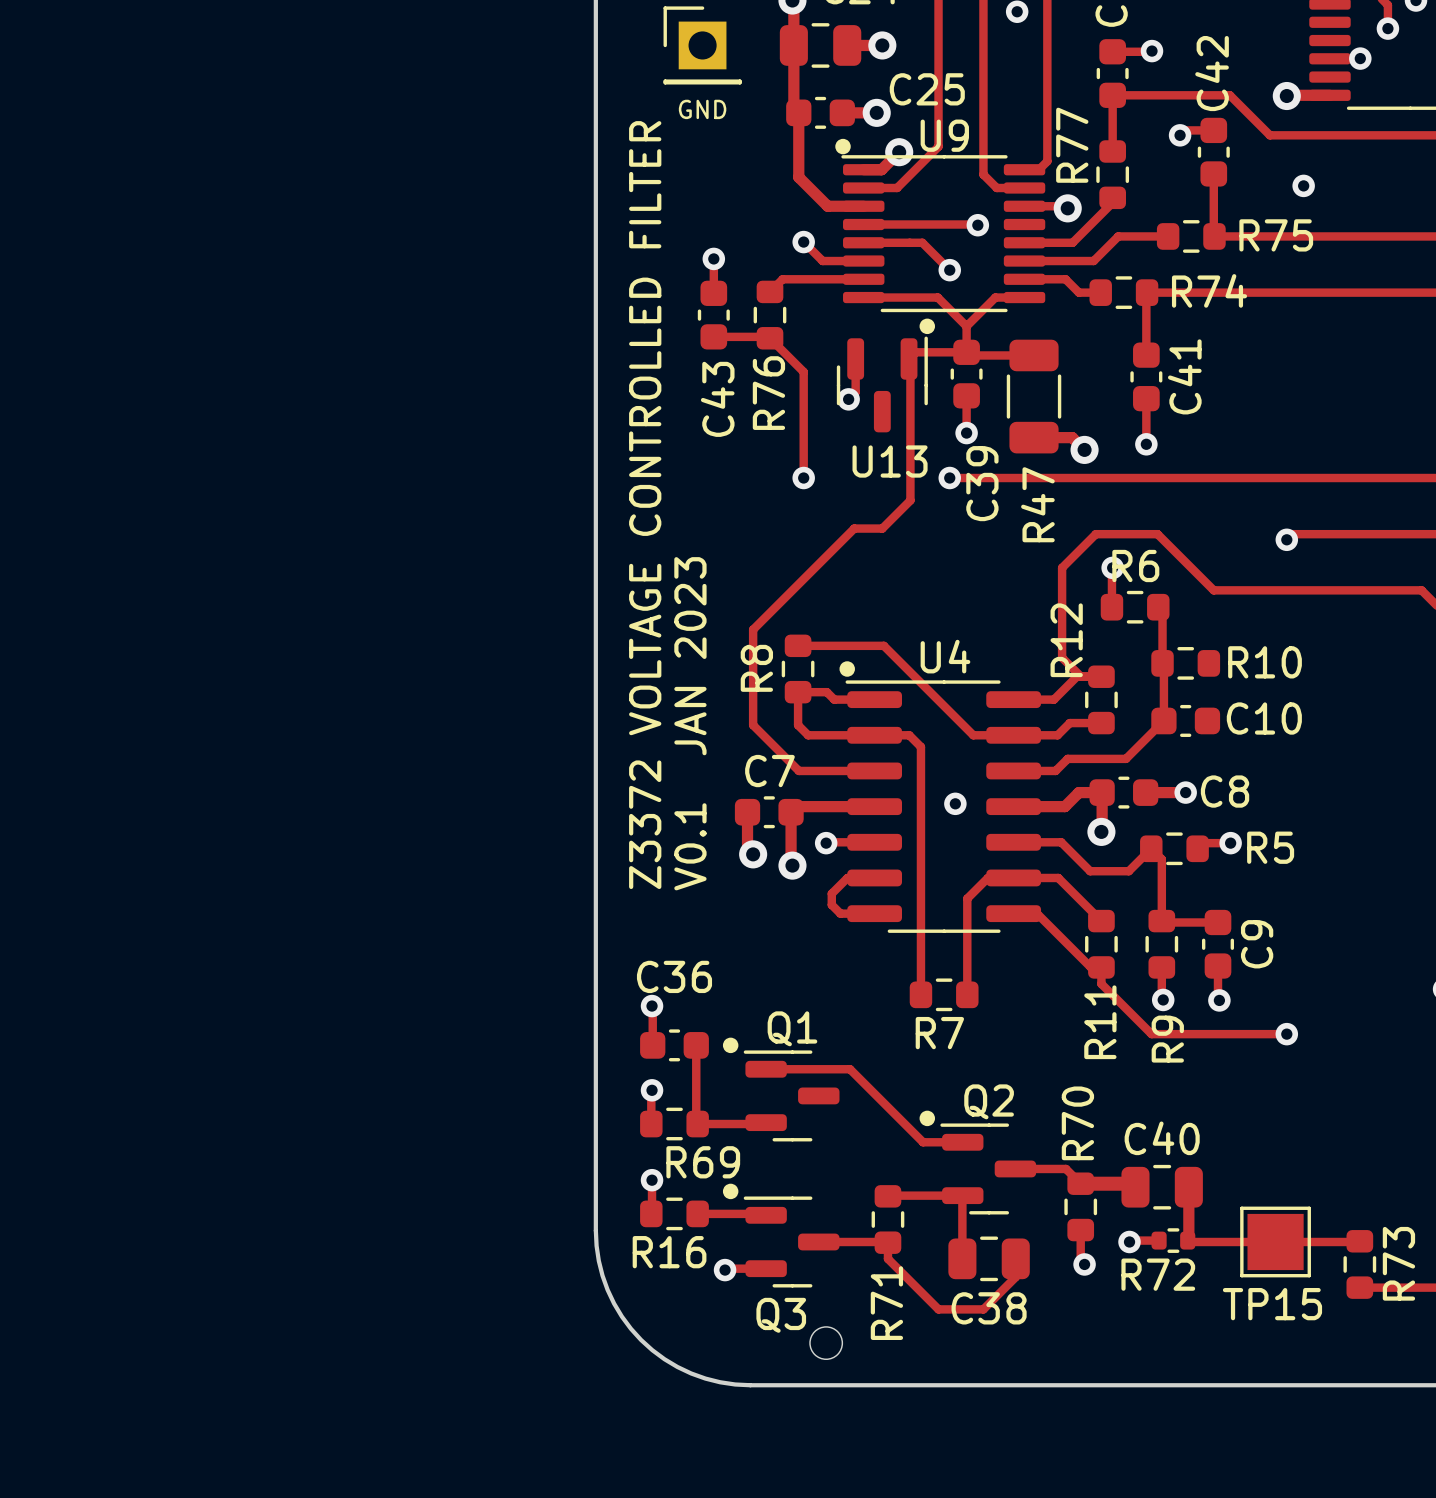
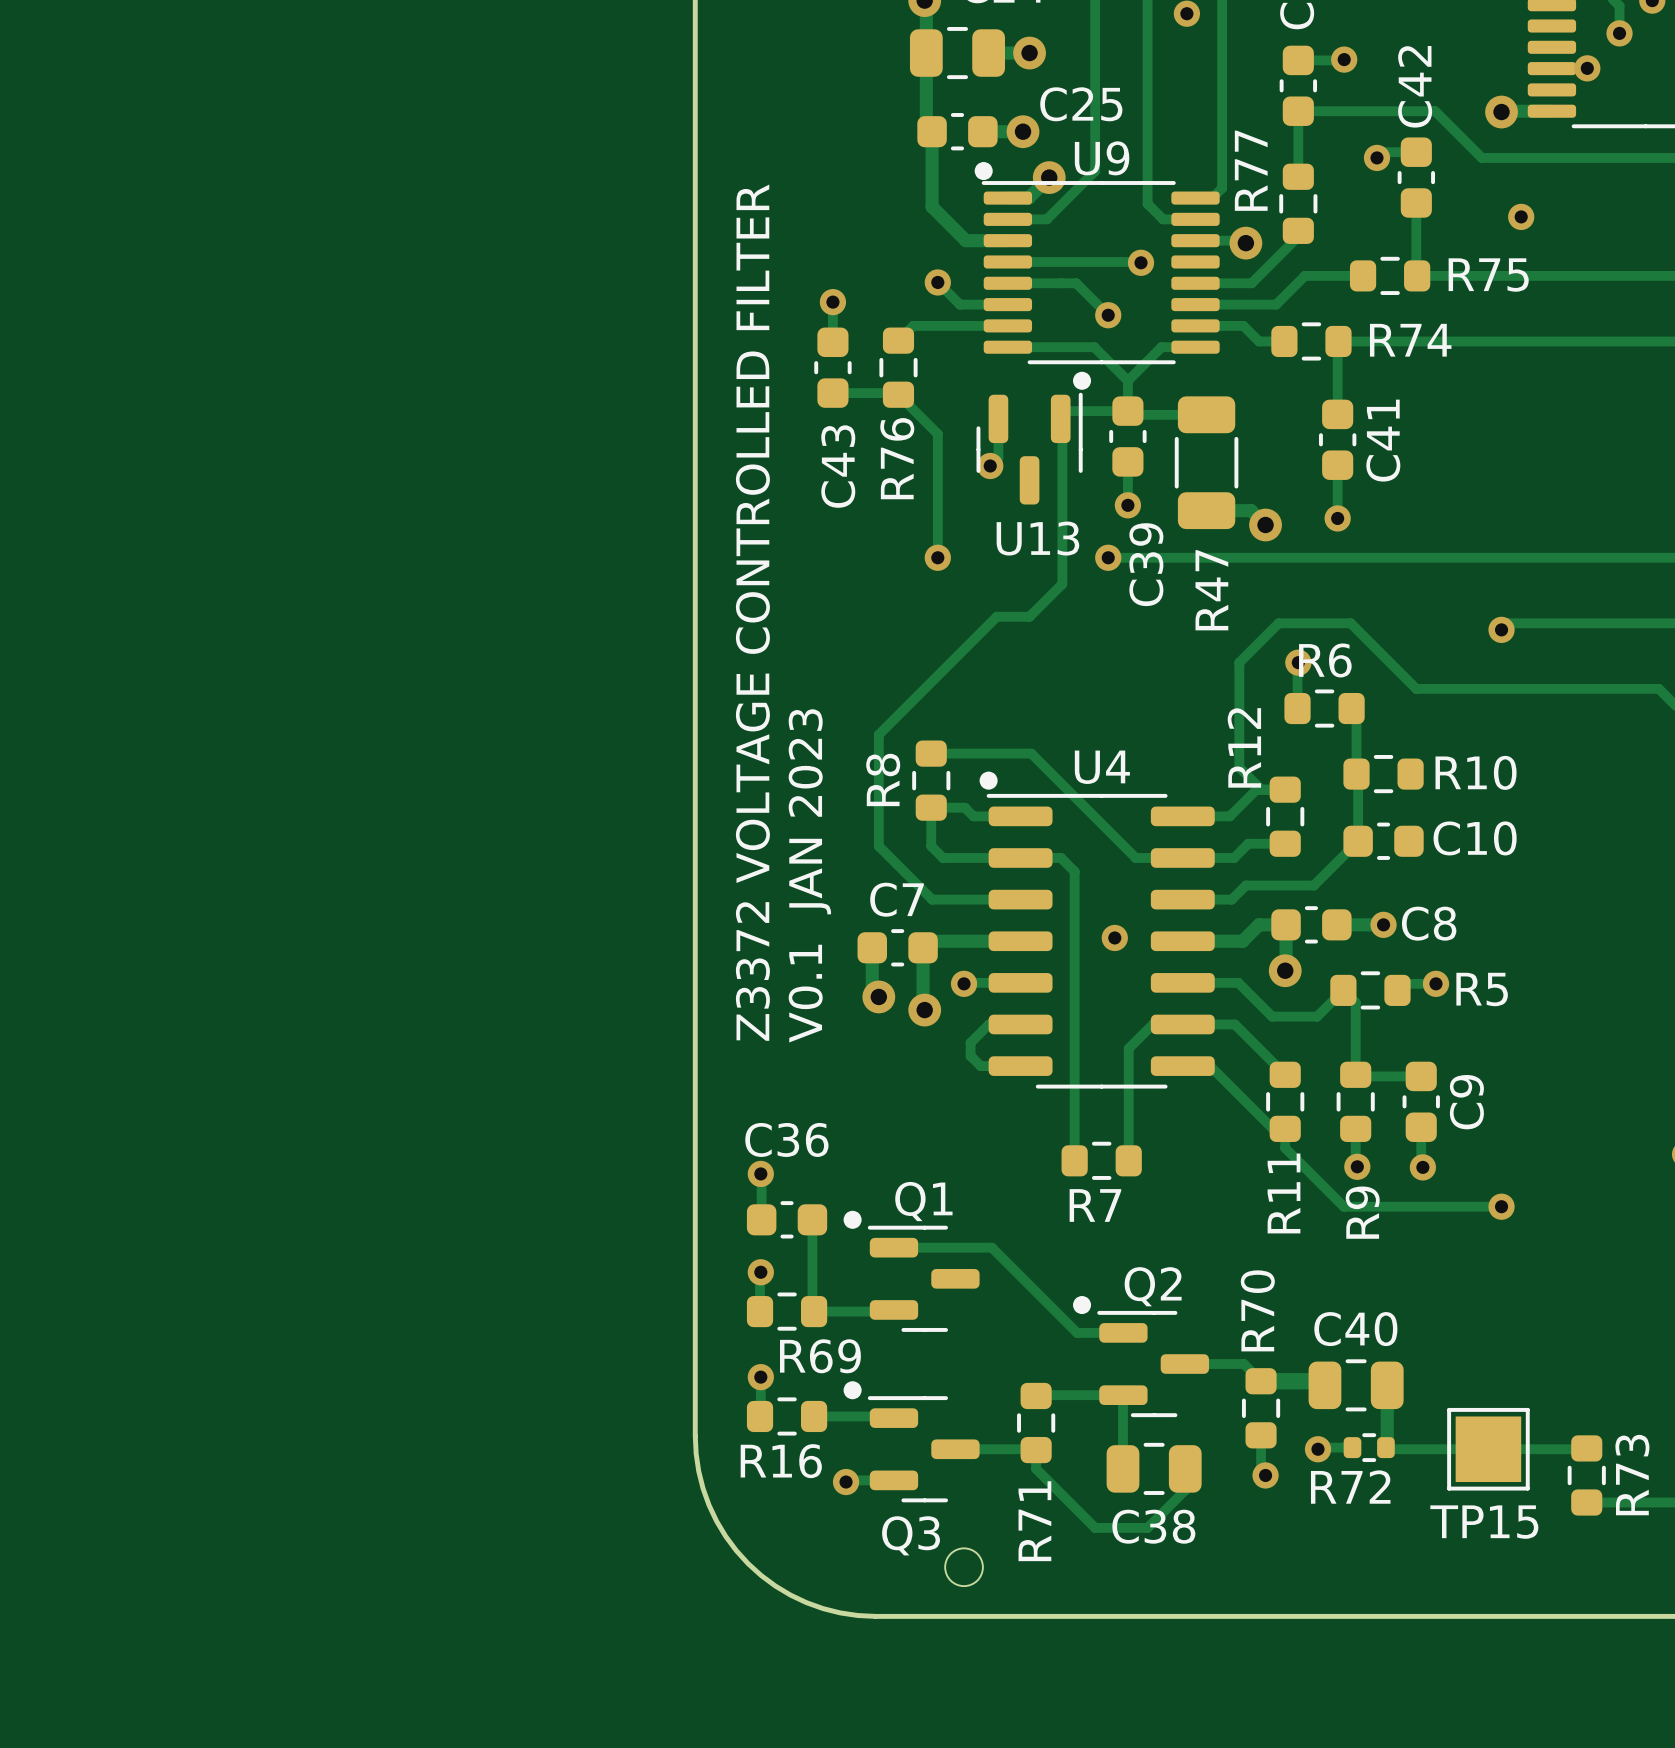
part: (702, 45) -> none
text: GND (702, 109) -> none

